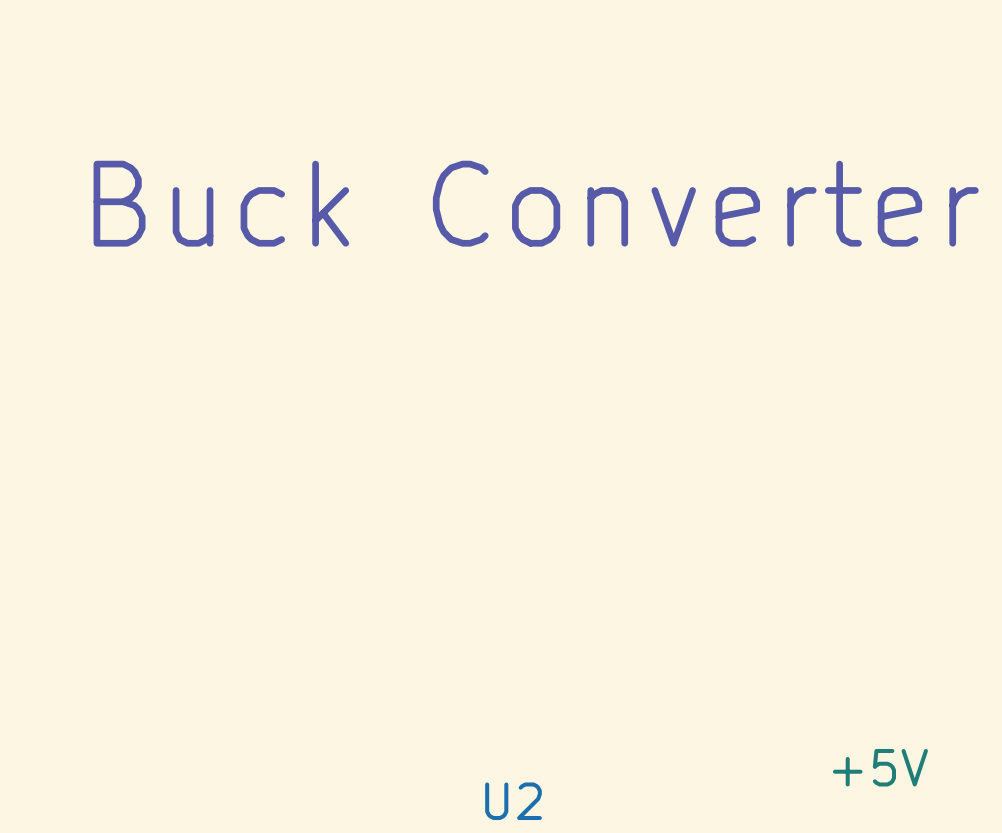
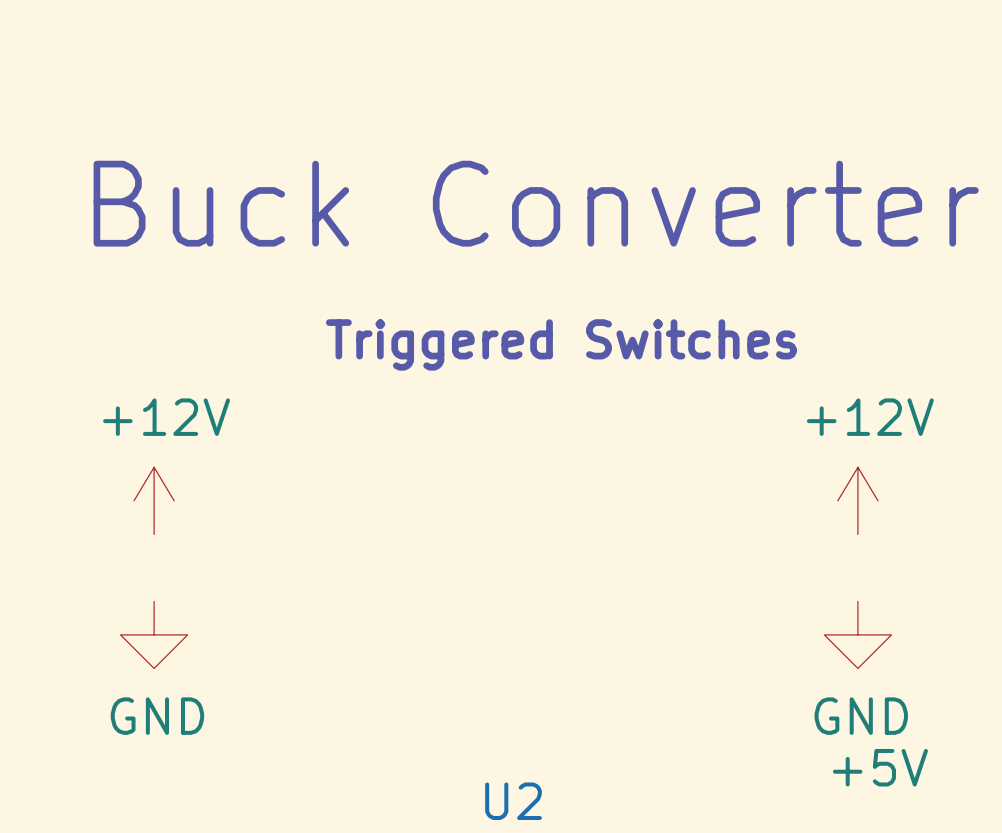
text: none -> Triggered Switches (561, 344)
power symbol: none -> +12V (154, 500)
power symbol: none -> +12V (857, 500)
power symbol: none -> GND (154, 634)
power symbol: none -> GND (857, 634)

